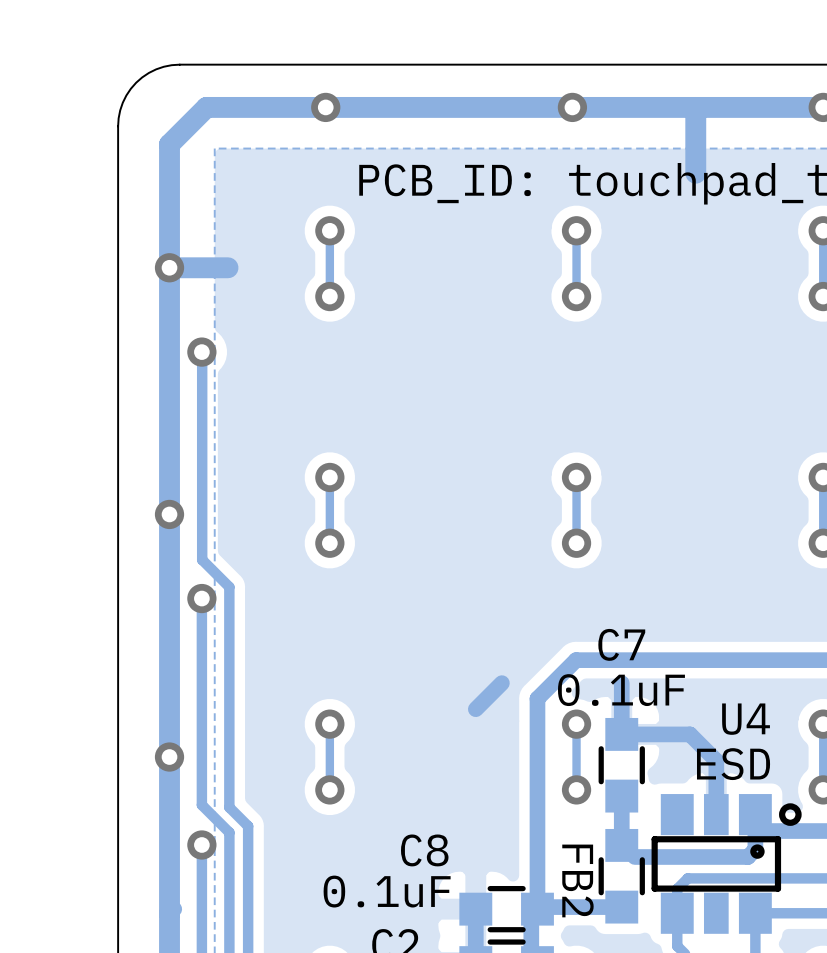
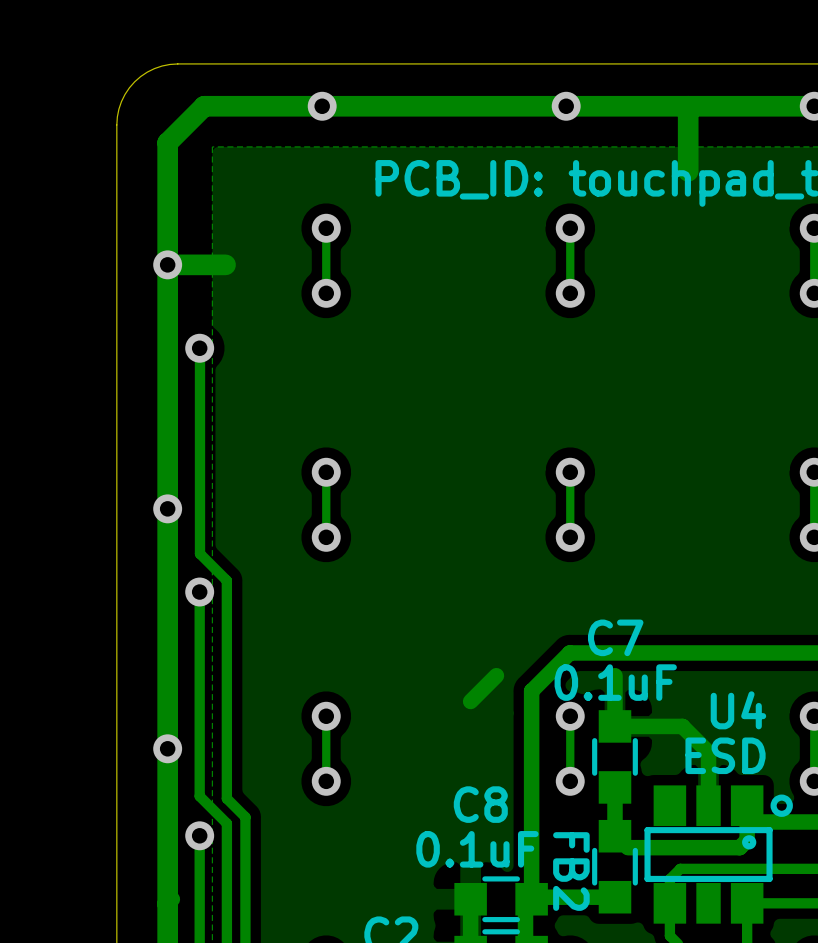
C8 name position: C8 (424, 850) -> C8 (480, 804)
C8 value position: 0.1uF (387, 891) -> 0.1uF (477, 849)

